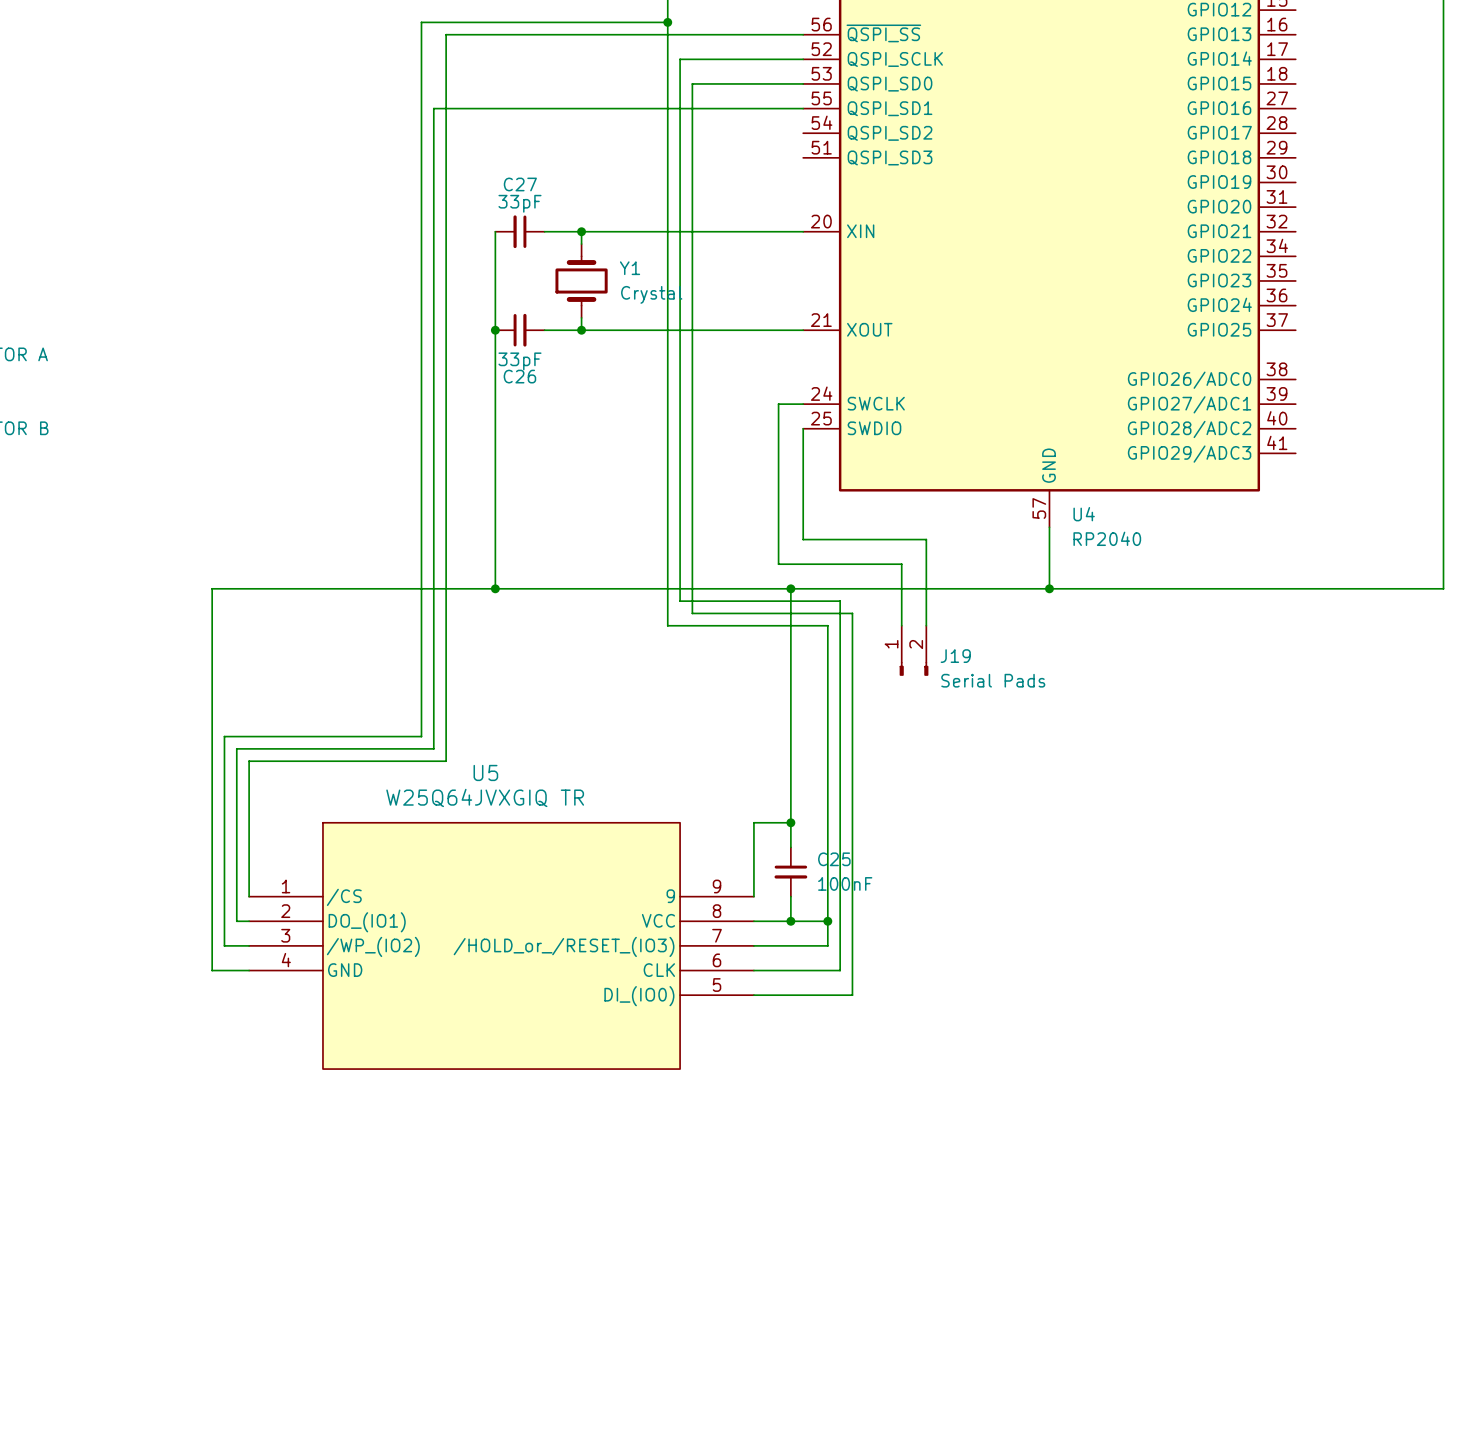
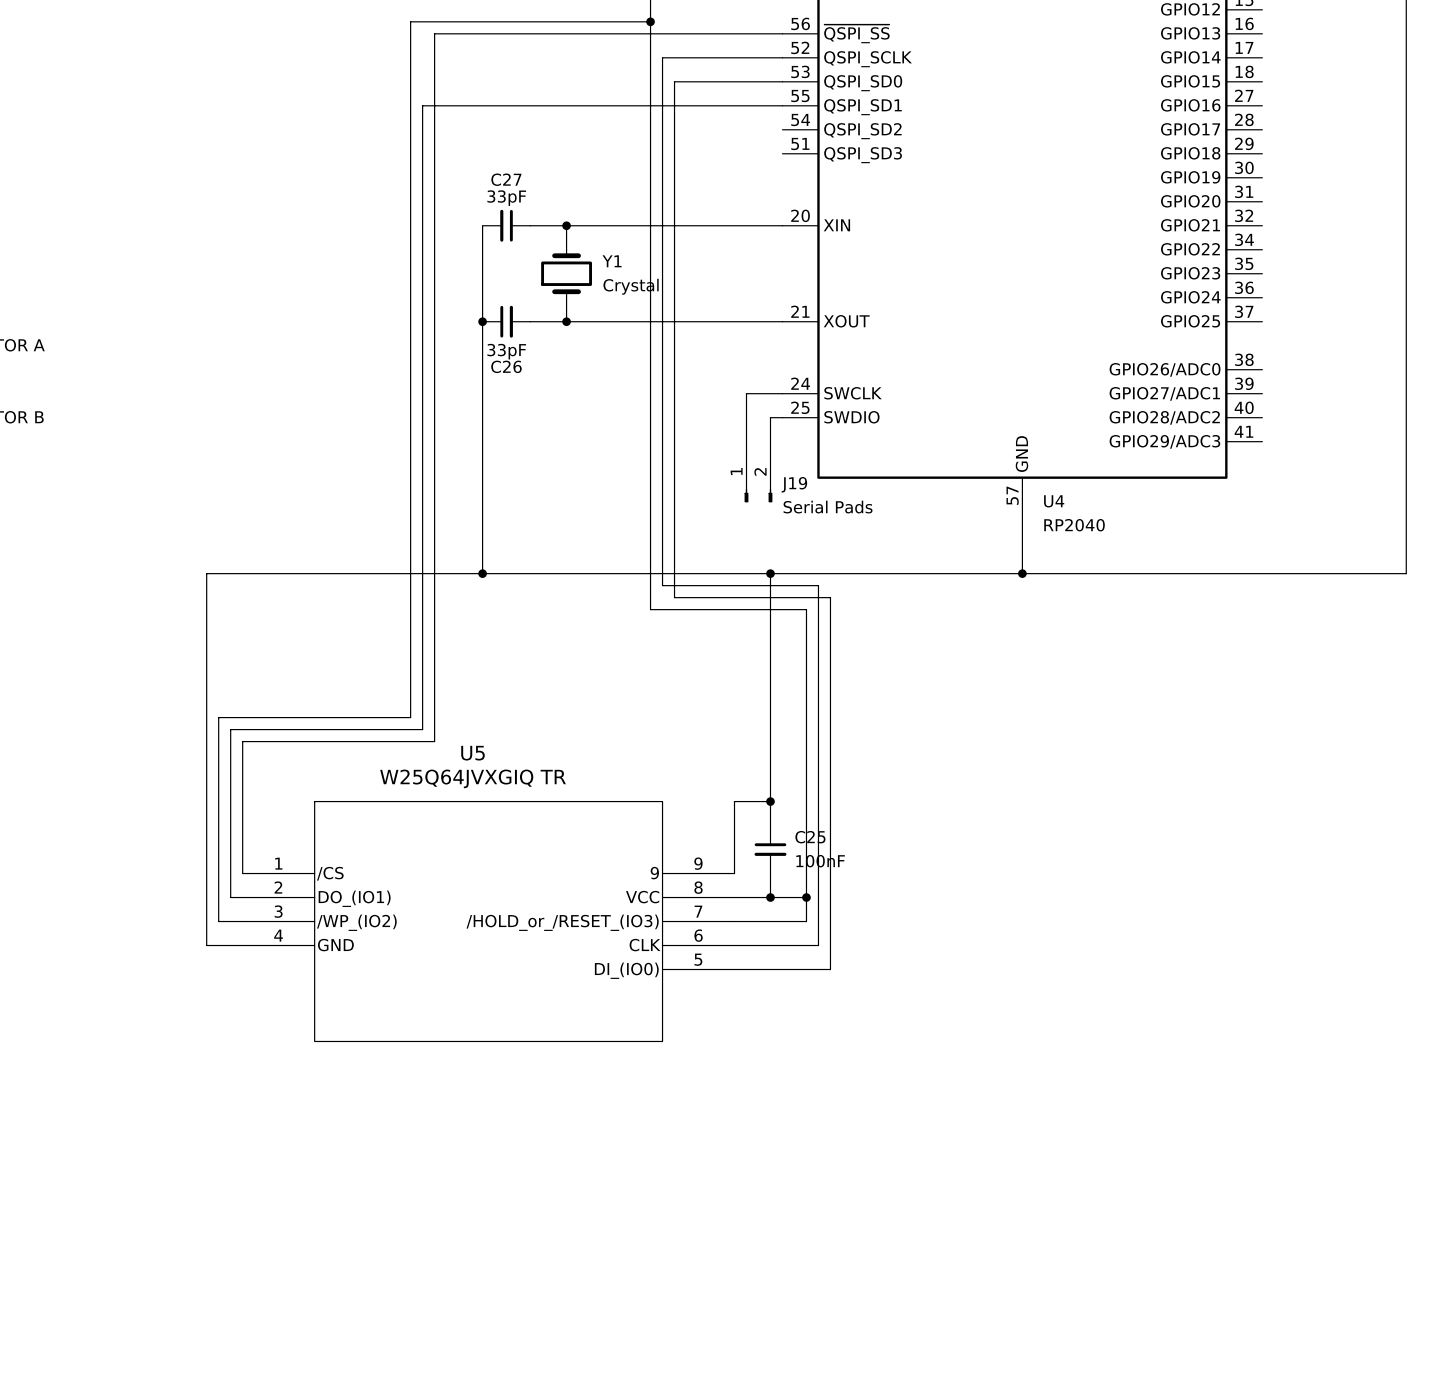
wire: (778, 404) (778, 564) (901, 564) (901, 625) -> (758, 393) (746, 393) (746, 453)
wire: (803, 428) (803, 539) (926, 539) (926, 625) -> (782, 417) (770, 417) (770, 453)
J19 position: (914, 650) -> (758, 478)

